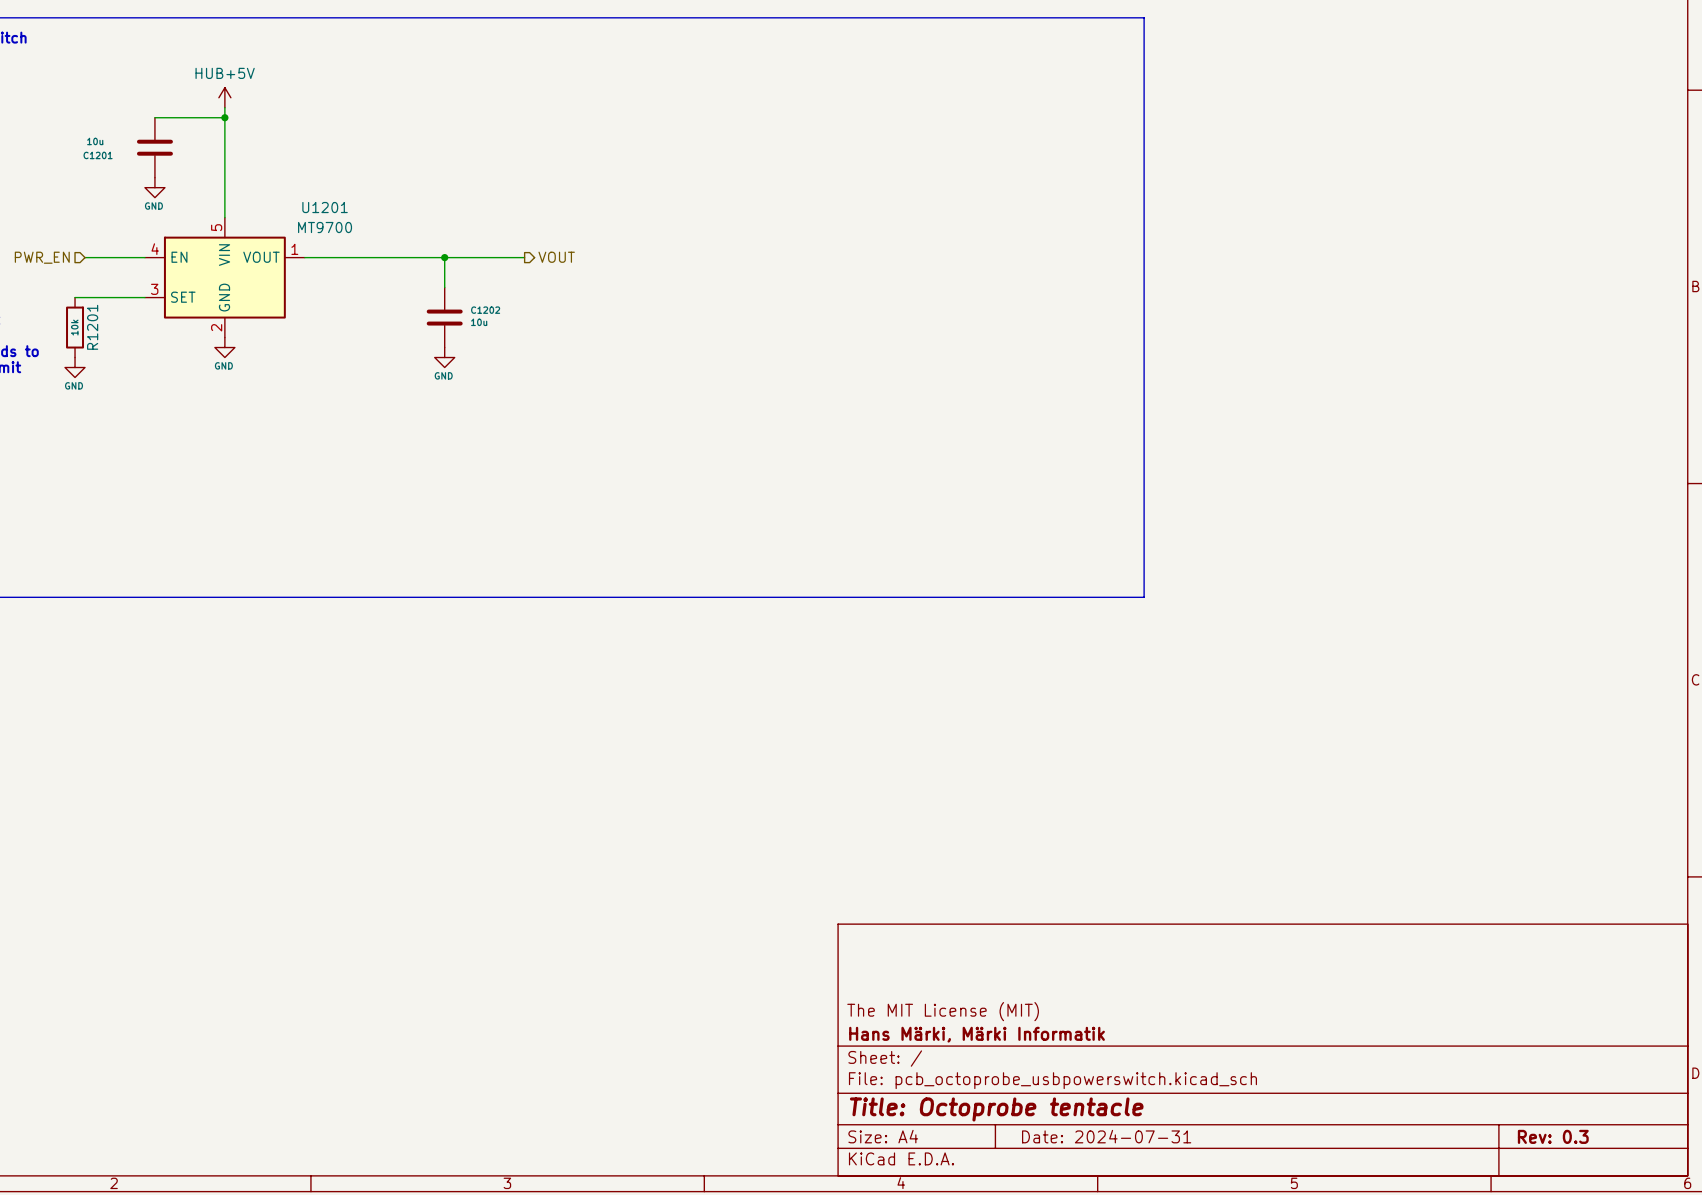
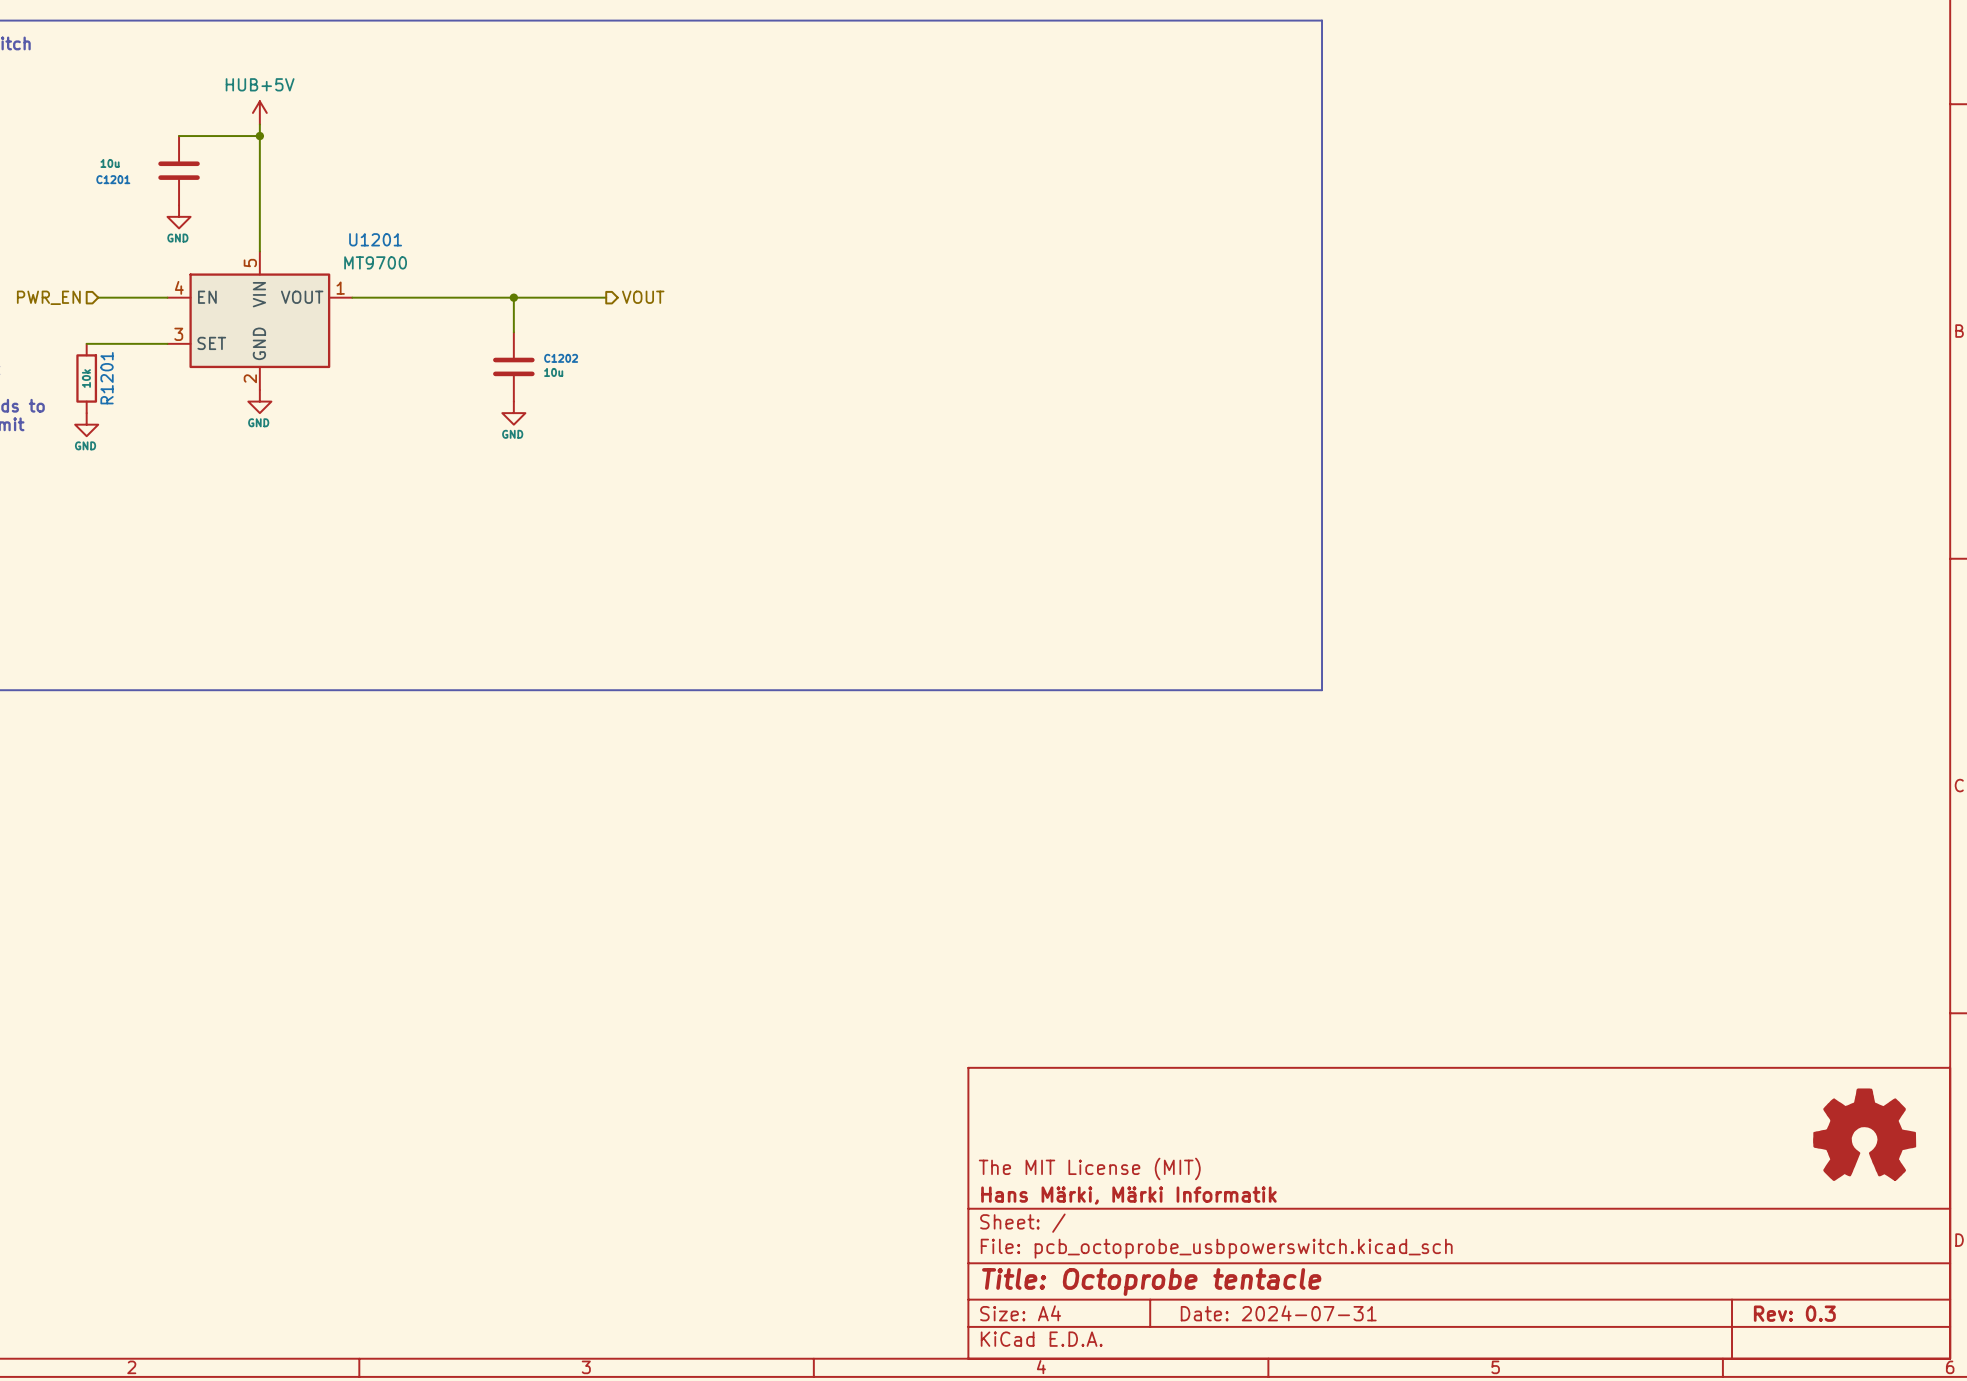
power symbol: none -> (1864, 1134)

